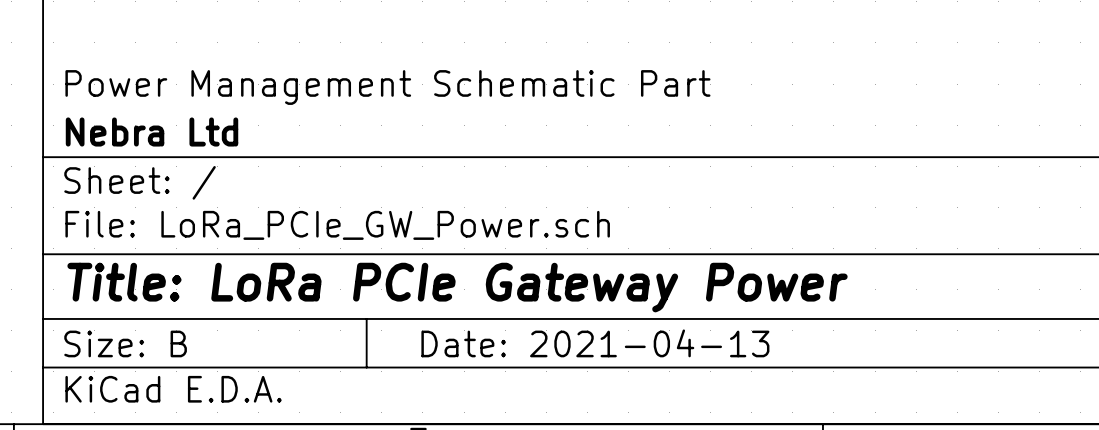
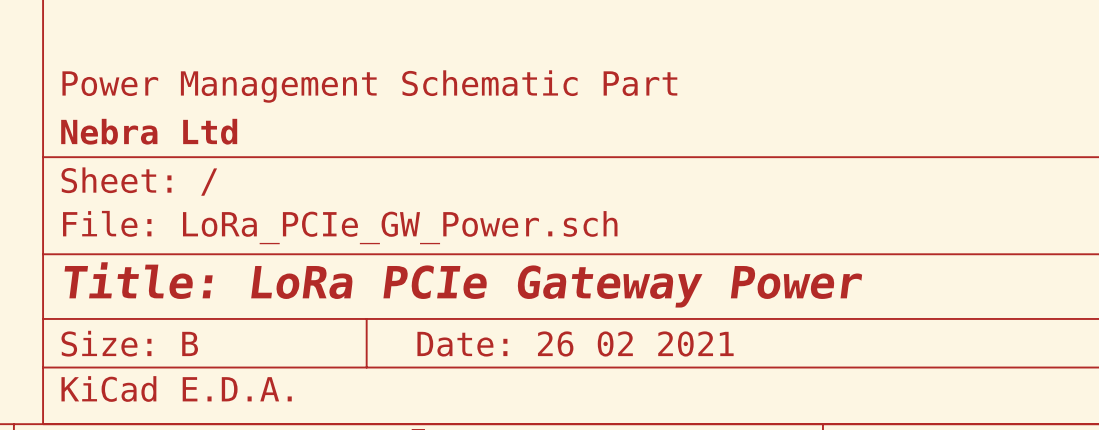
title block: Date: 2021-04-13 (595, 343) -> Date: 26 02 2021 (575, 343)

